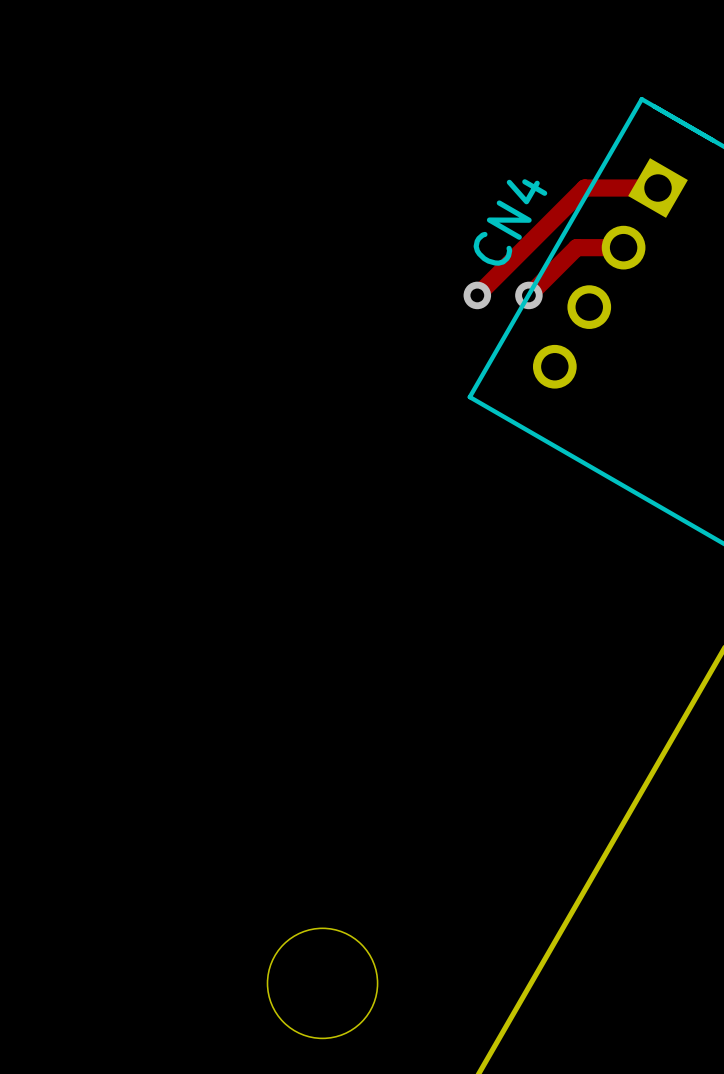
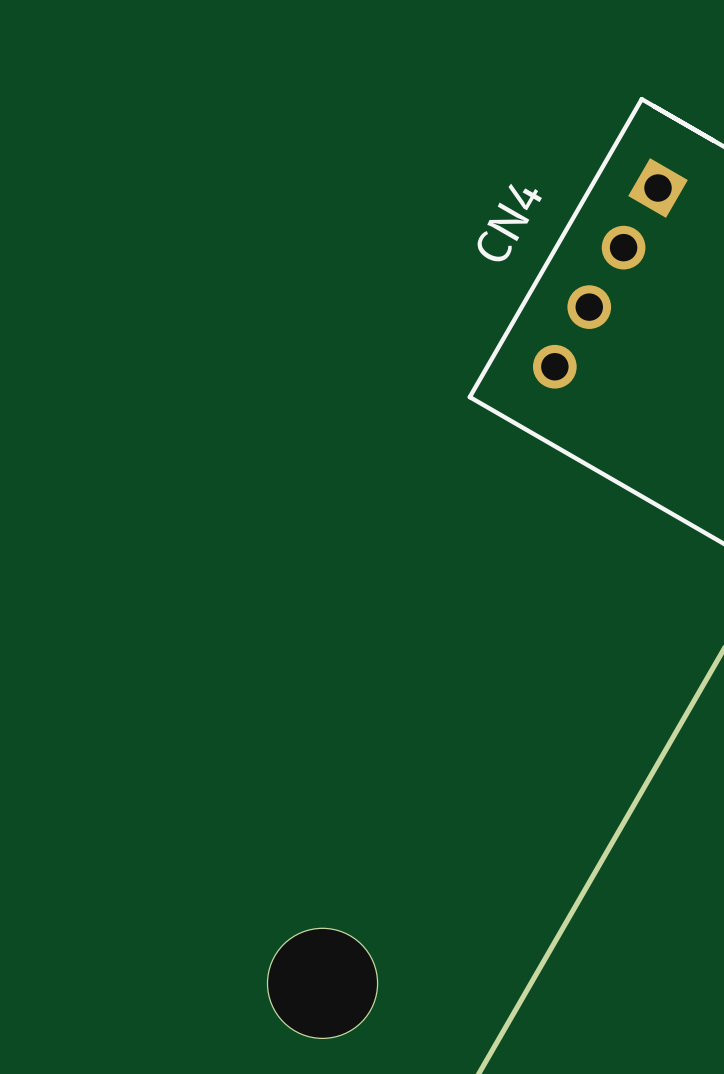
track: (658, 188) (584, 188) (477, 295) -> none
track: (623, 247) (576, 247) (528, 295) -> none
via: (477, 295) -> none
via: (528, 295) -> none

